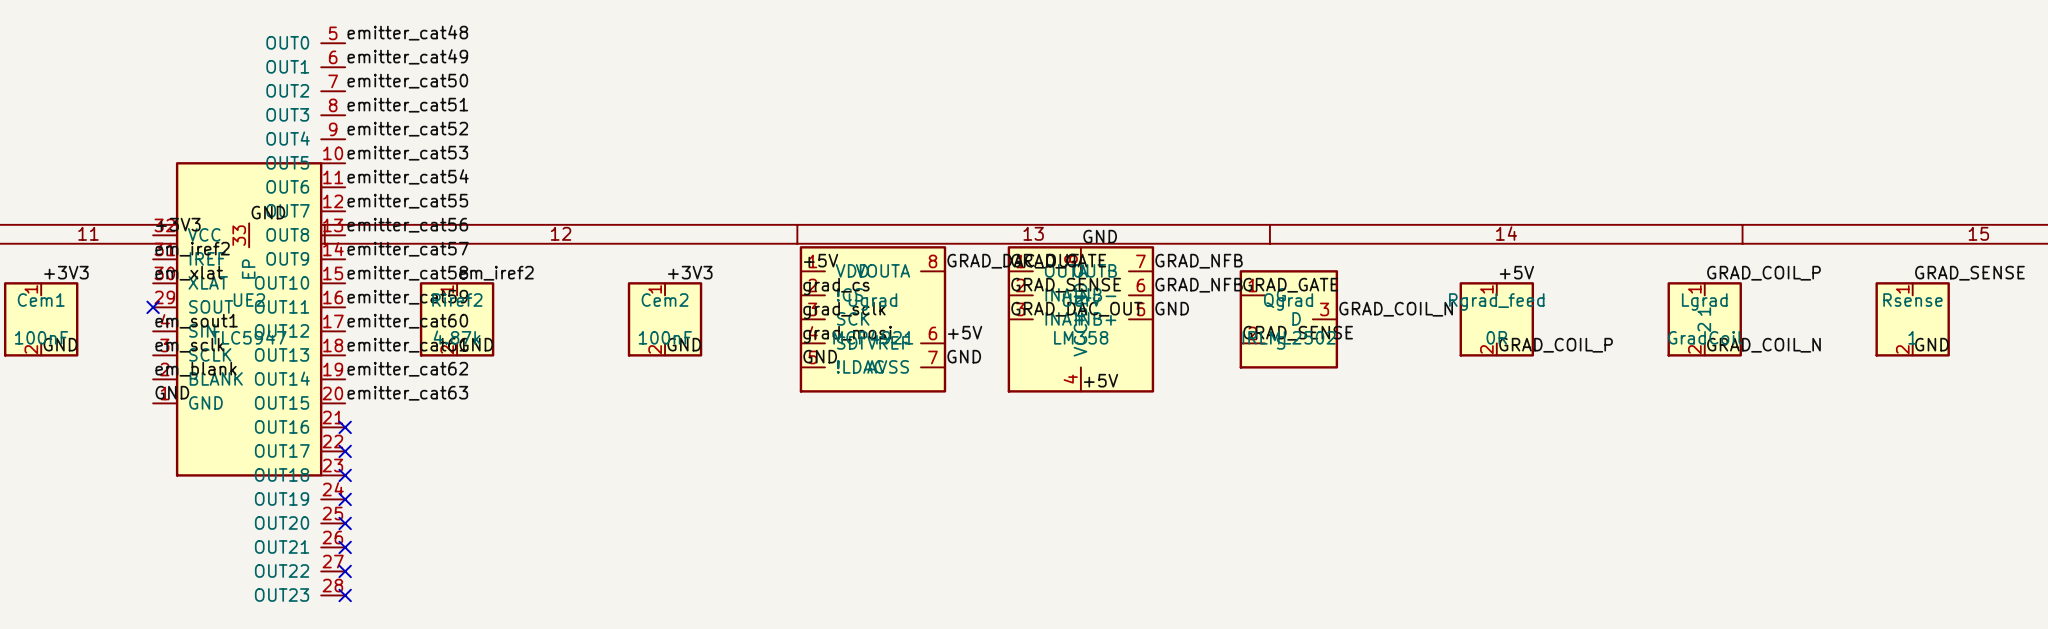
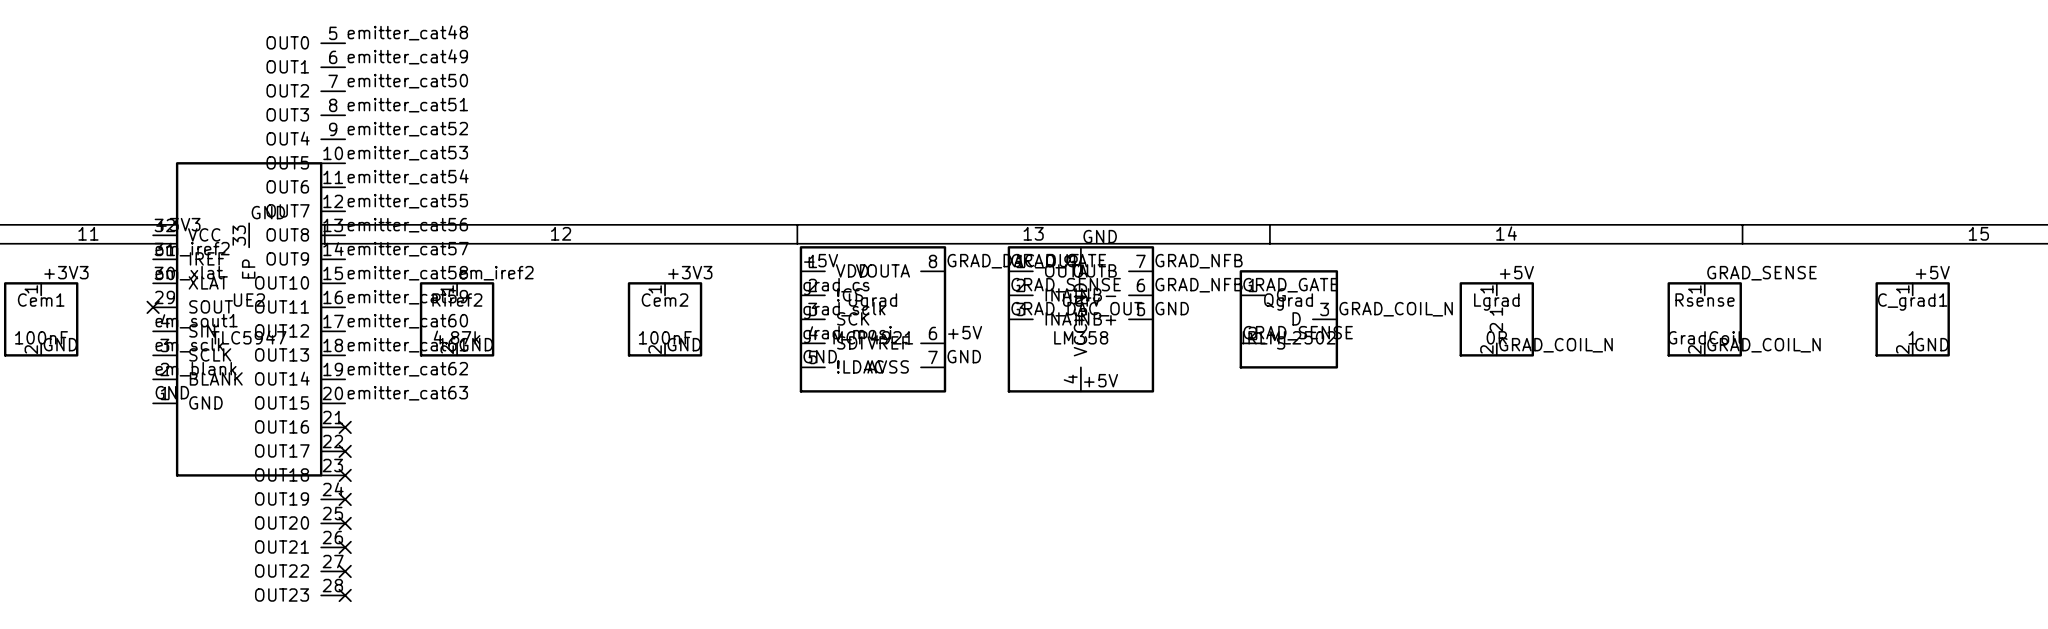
label: GRAD_COIL_P (1763, 273) -> GRAD_SENSE (1761, 273)
label: GRAD_SENSE (1969, 273) -> +5V (1932, 272)
Rsense name: Rsense (1912, 300) -> C_grad1 (1912, 302)
Rgrad_feed name: Rgrad_feed (1496, 302) -> Lgrad (1496, 302)
Lgrad name: Lgrad (1704, 302) -> Rsense (1705, 300)
Rgrad_feed pin name: none -> 1 (1496, 311)
Lgrad pin name: 1 (1704, 311) -> none
Rgrad_feed pin name: none -> 2 (1496, 327)
Lgrad pin name: 2 (1704, 327) -> none
label: GRAD_COIL_P (1556, 345) -> GRAD_COIL_N (1556, 345)

